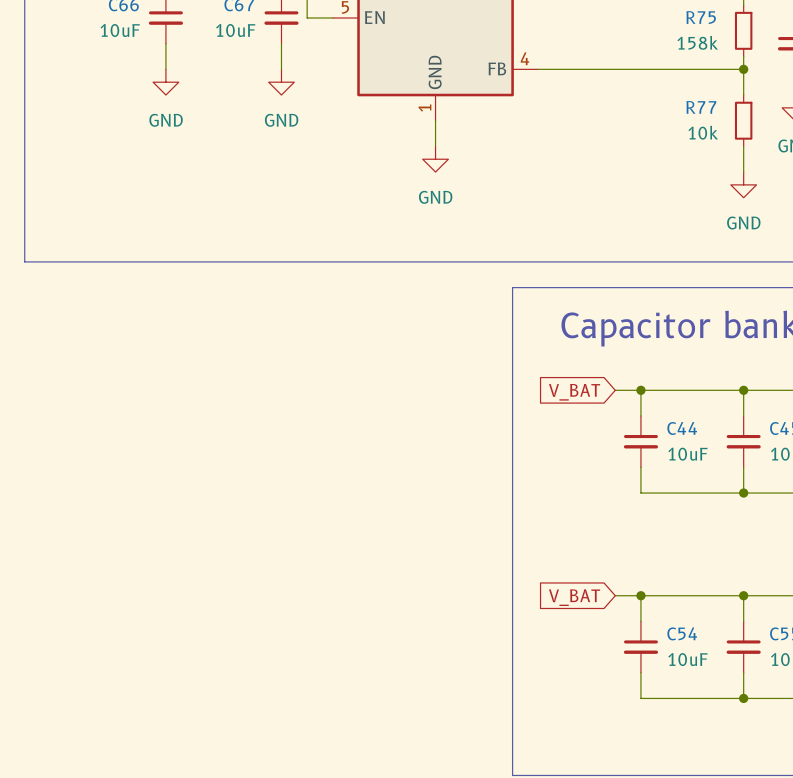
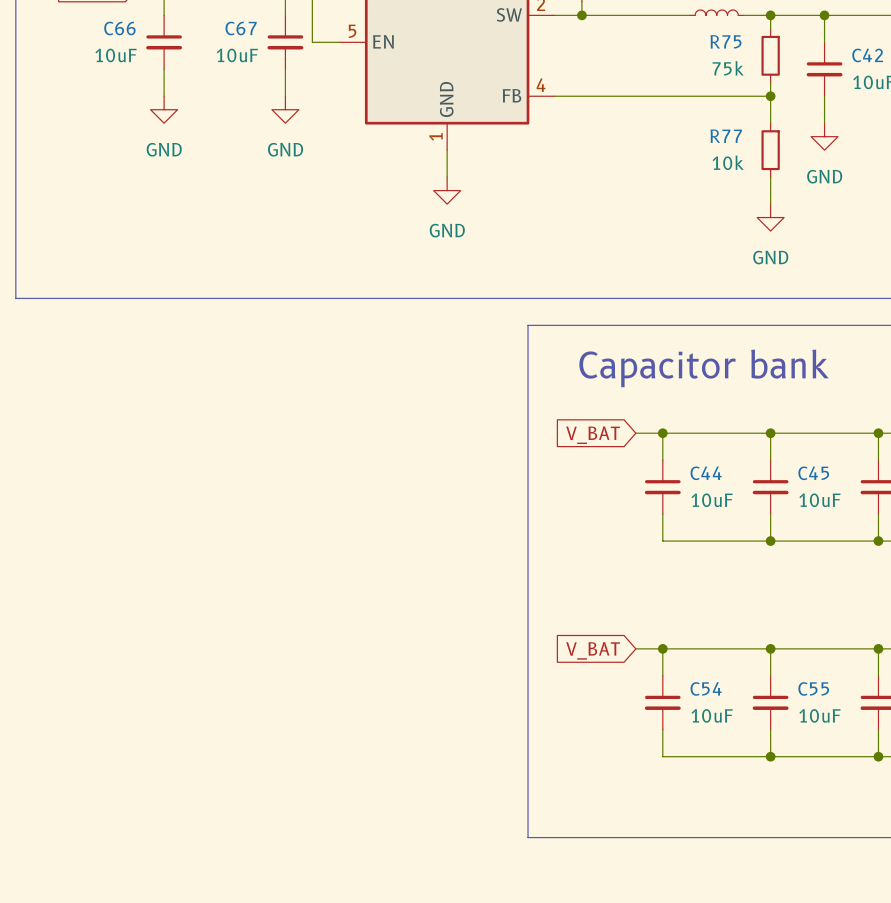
R75 value: 158k (697, 42) -> 75k (728, 68)

